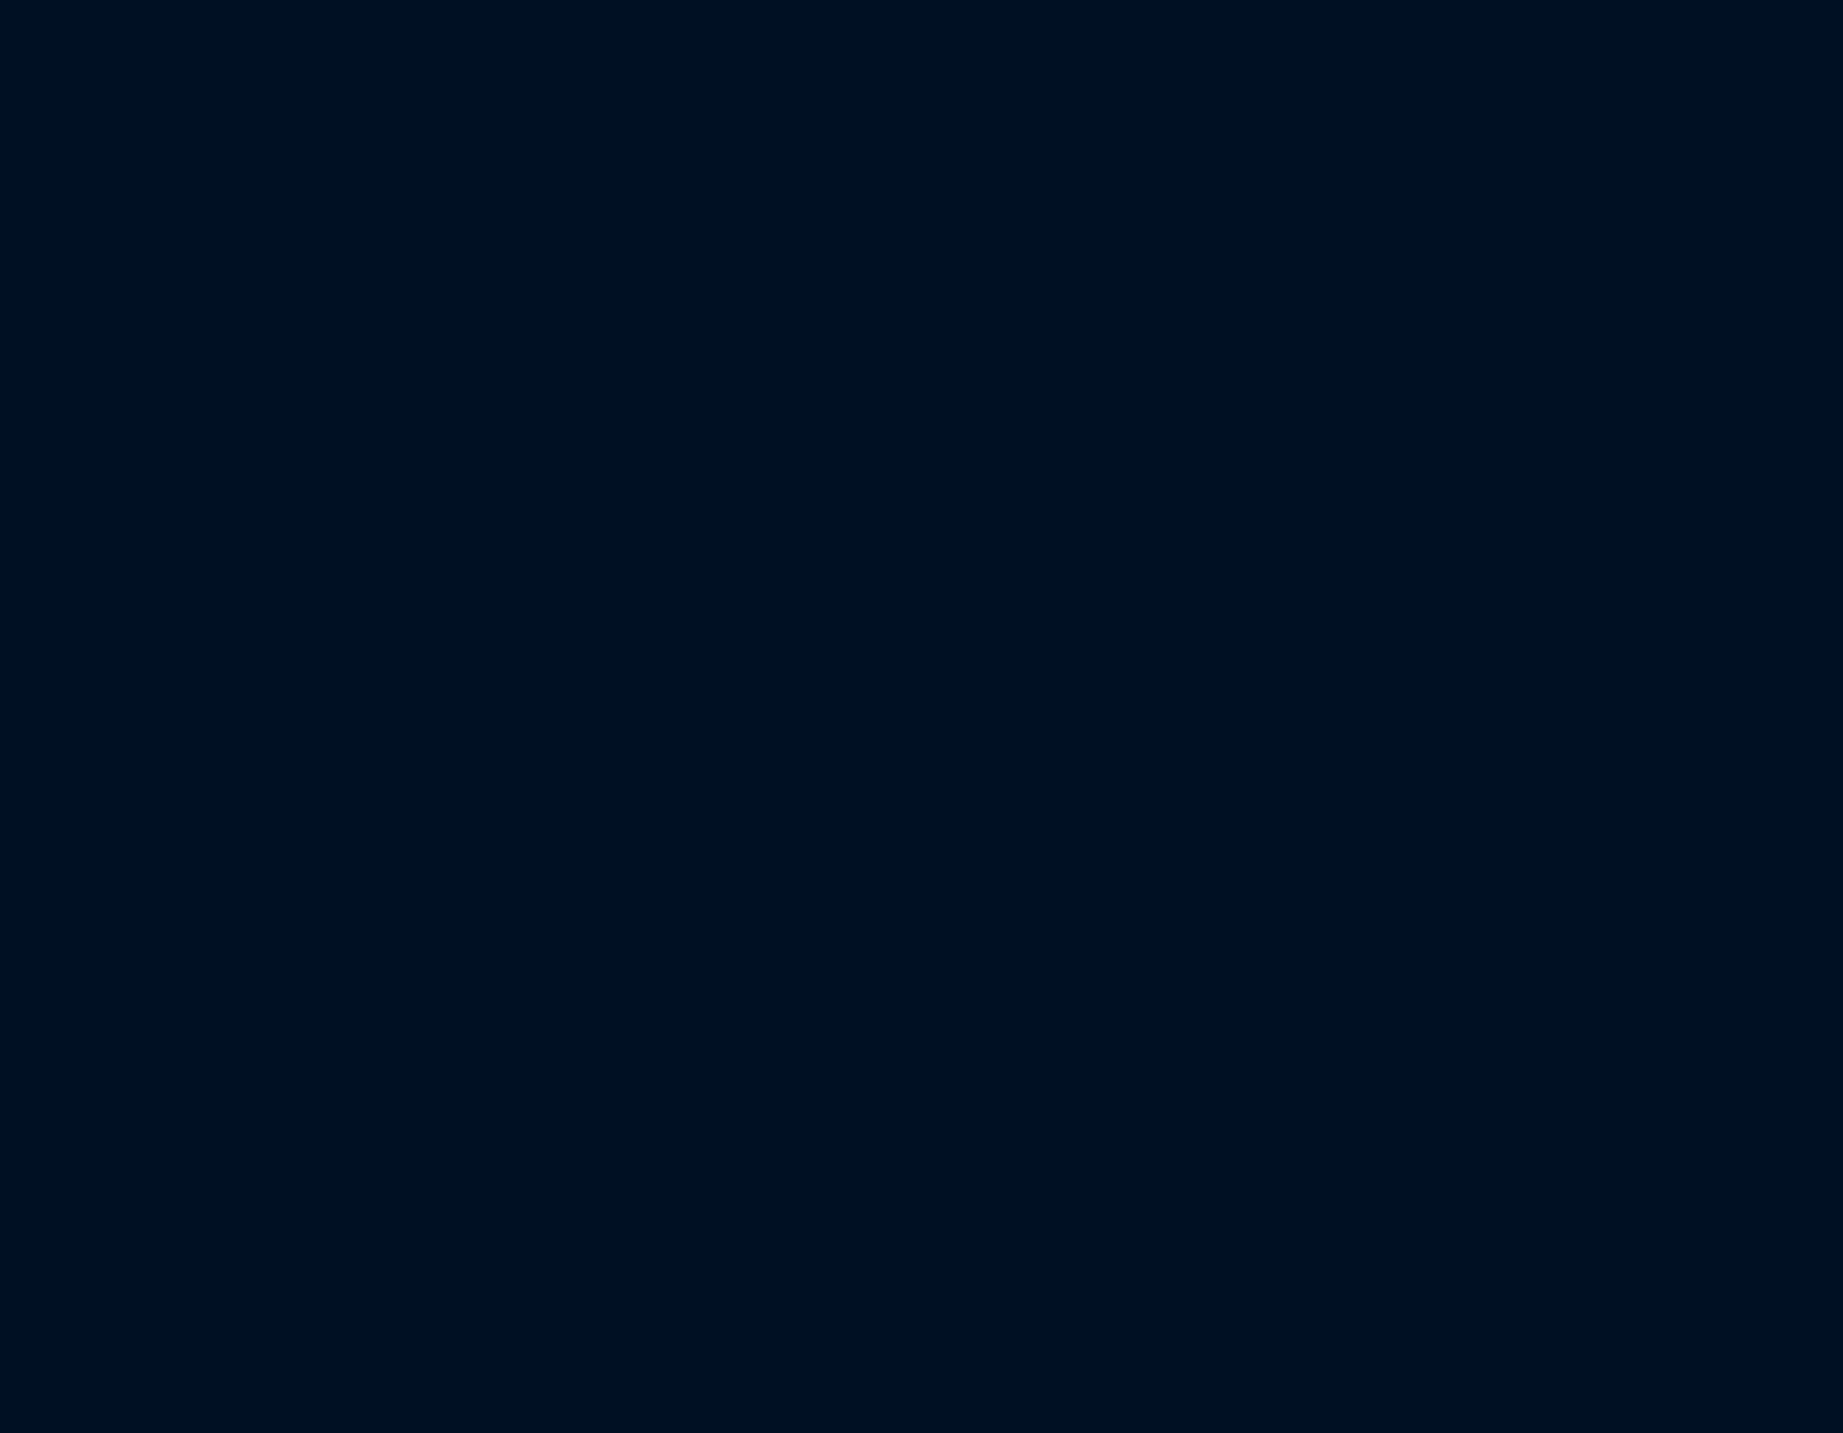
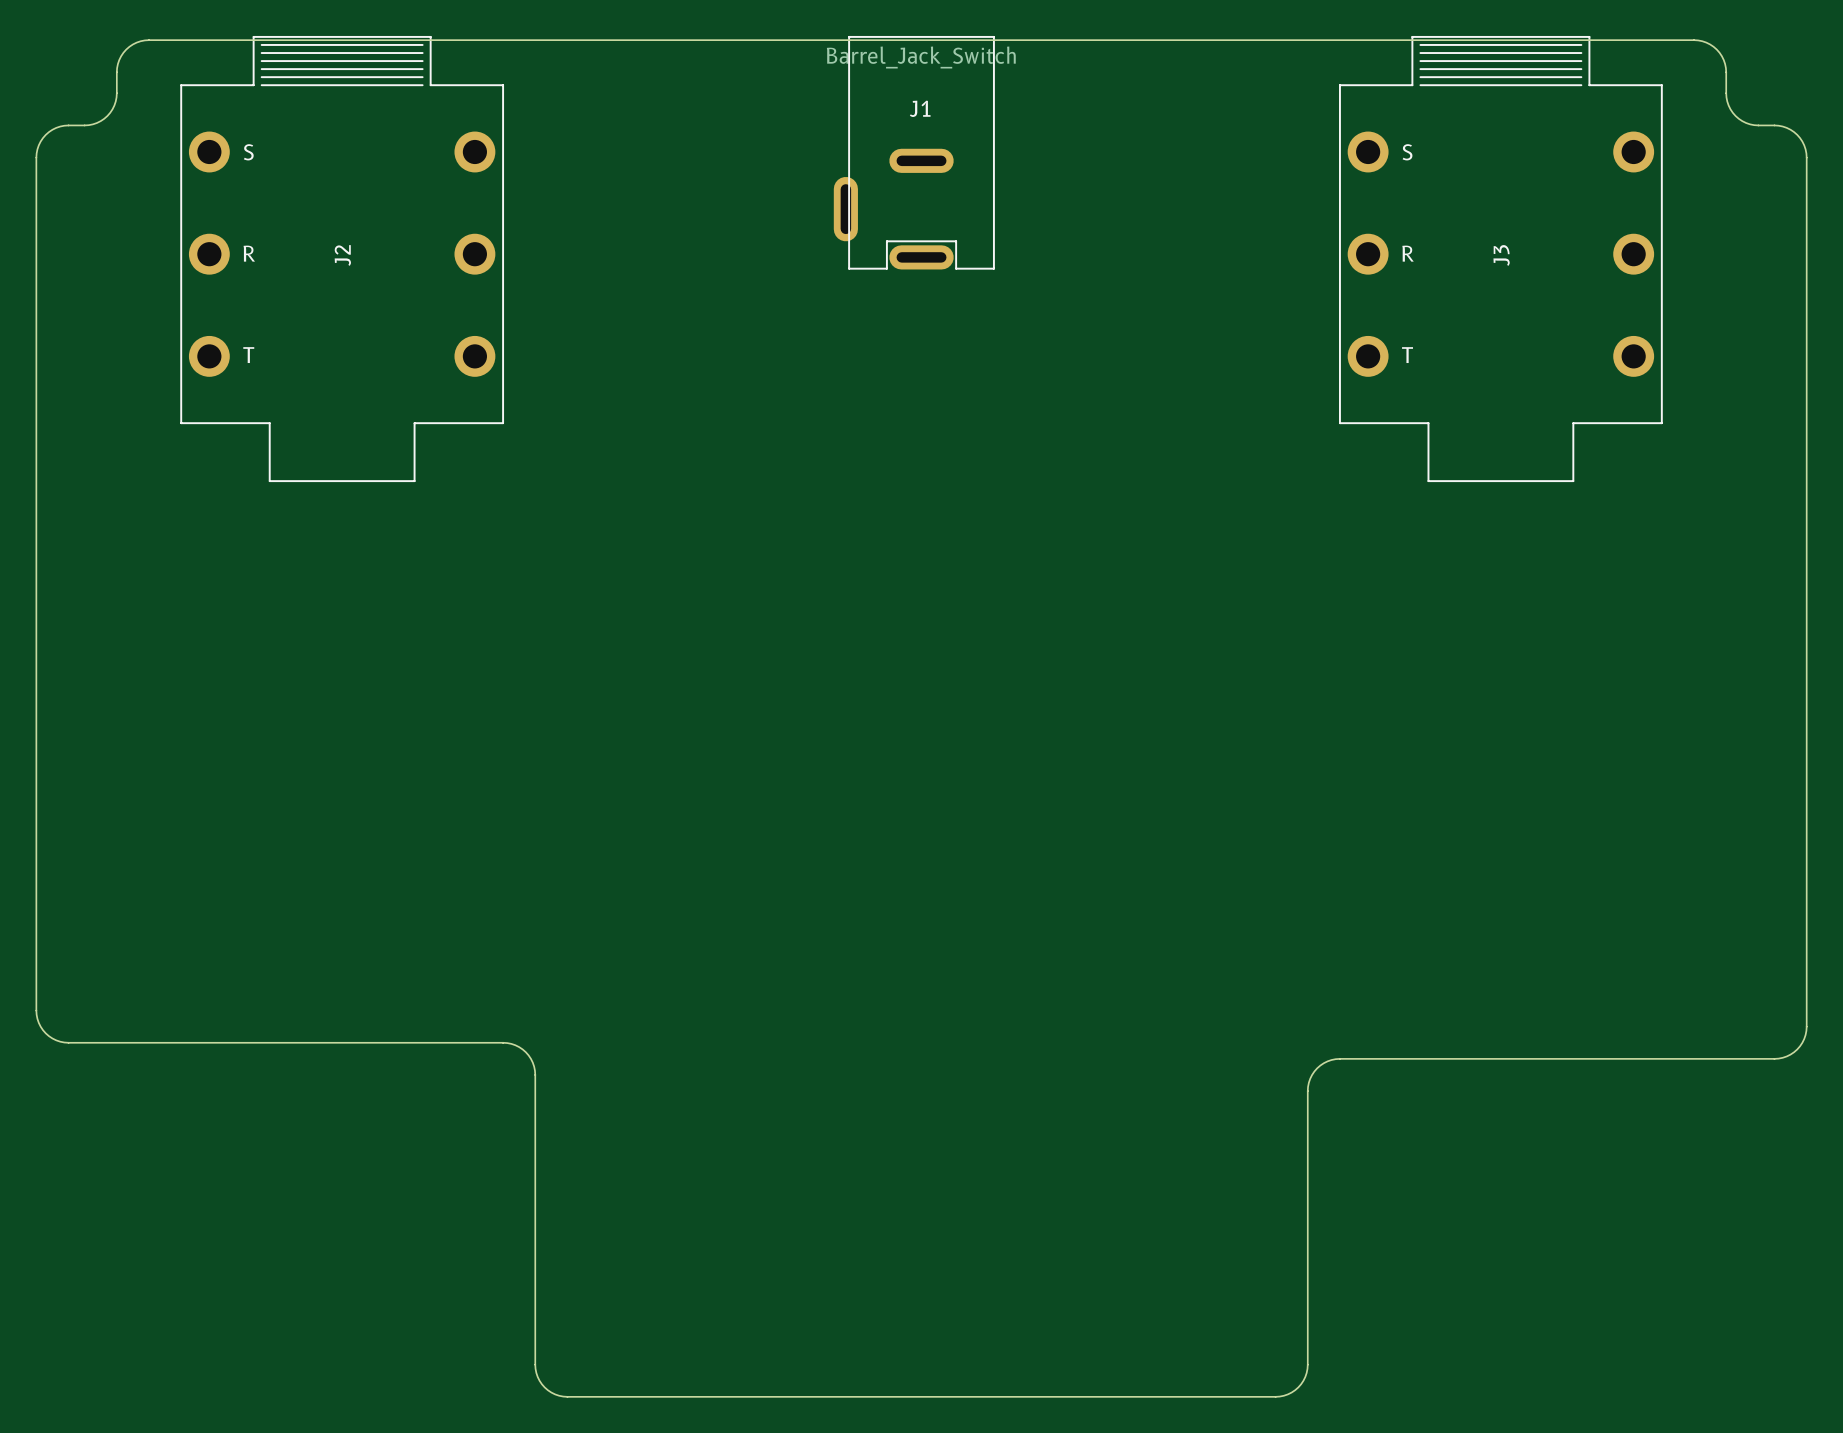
board edge: none -> (149, 40) (1694, 40) (1710, 44) (1719, 52) (1723, 60) (1727, 101) (1735, 116) (1750, 124) (1778, 125) (1790, 129) (1800, 138) (1806, 153) (1806, 1026) (1802, 1042) (1790, 1054) (1774, 1058) (1339, 1058) (1327, 1061) (1320, 1065) (1312, 1074) (1307, 1091) (1307, 1368) (1303, 1380) (1298, 1387) (1283, 1395) (567, 1396) (551, 1392) (539, 1380) (535, 1368) (535, 1074) (530, 1058) (522, 1049) (515, 1045) (503, 1042) (68, 1042) (56, 1040) (48, 1036) (43, 1030) (37, 1018) (36, 153) (43, 138) (52, 129) (64, 125) (92, 124) (107, 116) (115, 101) (117, 68) (121, 56) (132, 44) (149, 40)
J1: none -> Barrel_Jack_Switch (914, 152)
J2: none -> (342, 259)
J3: none -> (1500, 259)

